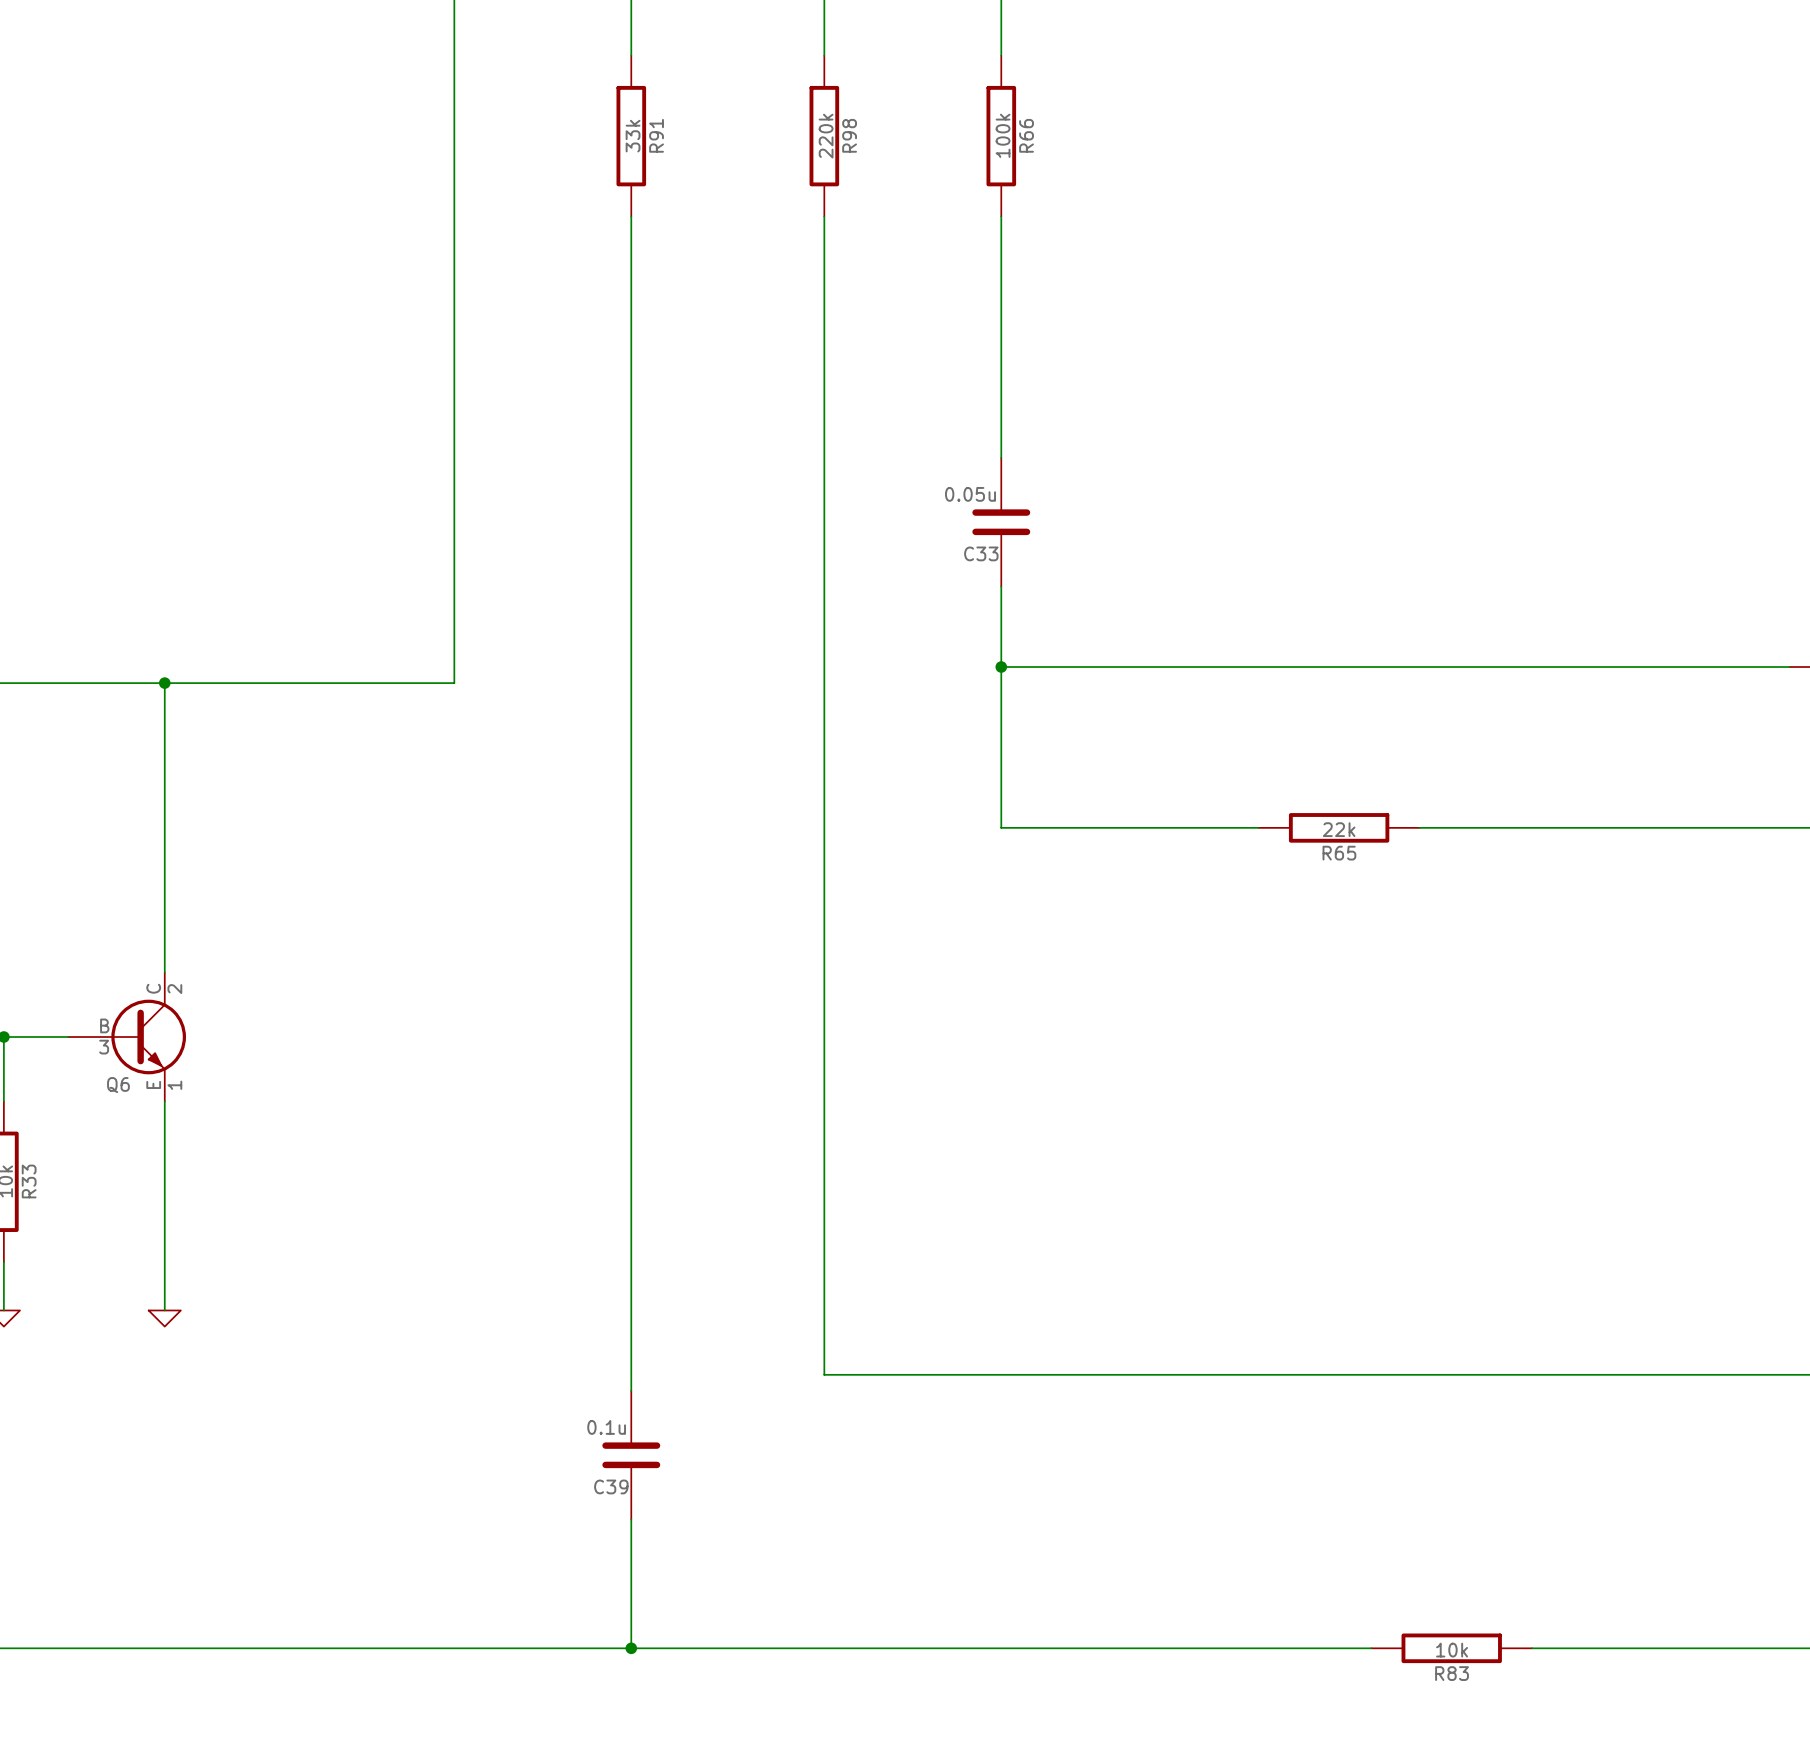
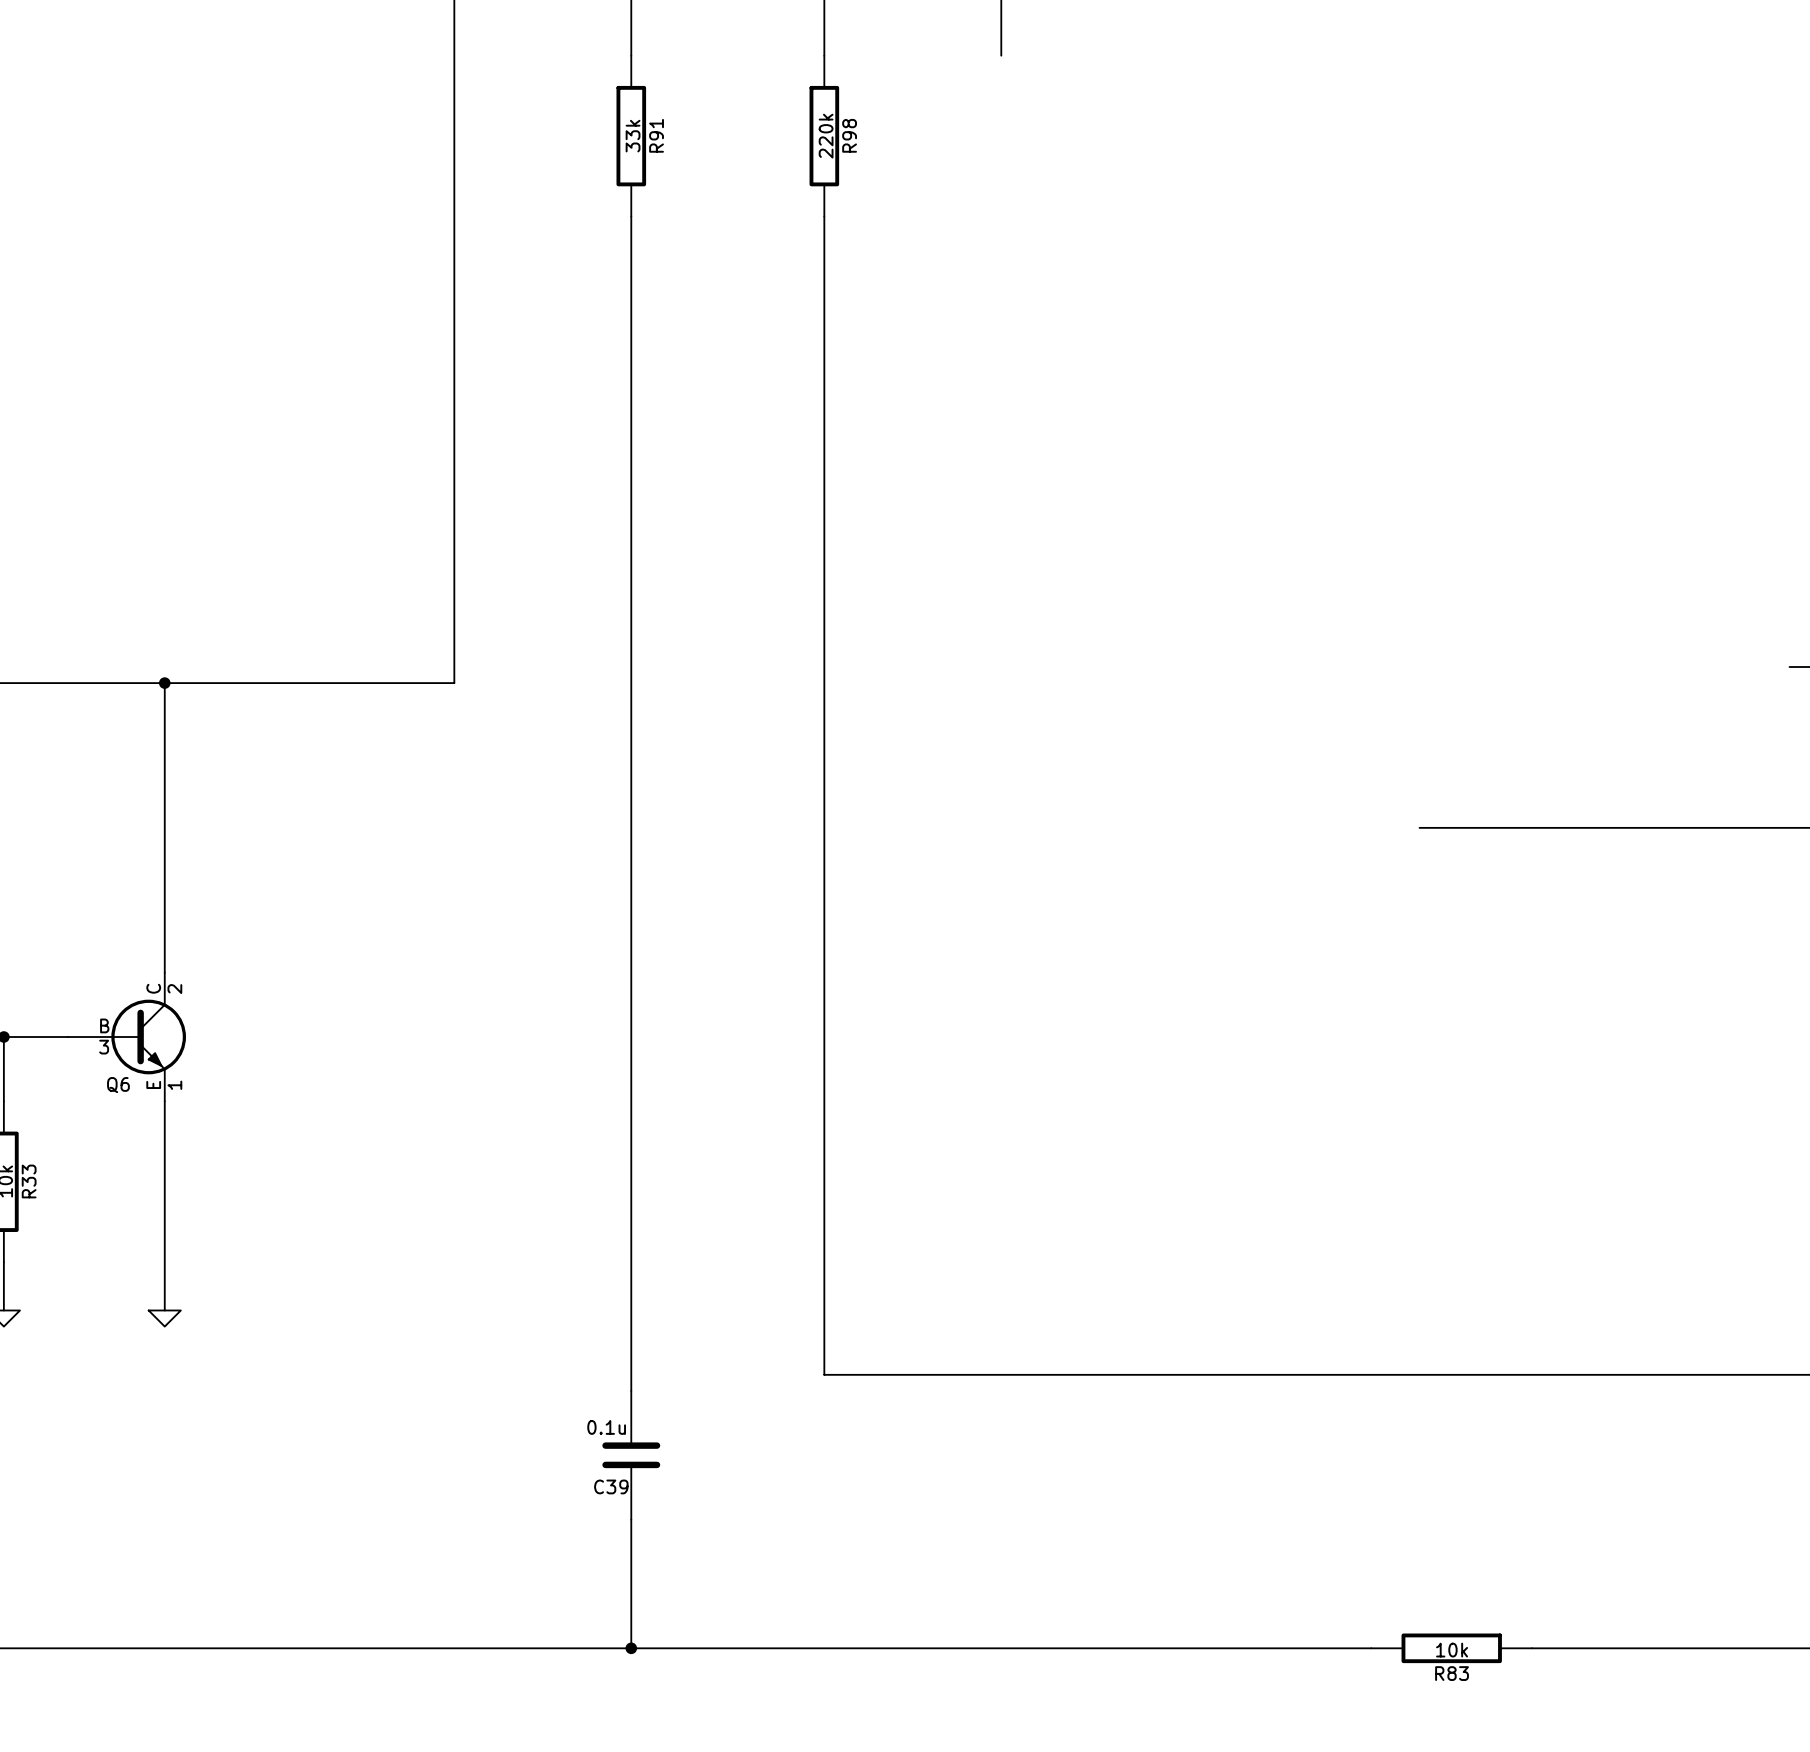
R66: 100k (1001, 136) -> none
wire: (1001, 216) (1001, 457) -> none
C33: 0.05u (1001, 522) -> none
wire: (1001, 586) (1001, 827) (1258, 827) -> none
wire: (1001, 667) (1789, 667) -> none
junction: (1001, 667) -> none
R65: 22k (1339, 827) -> none

